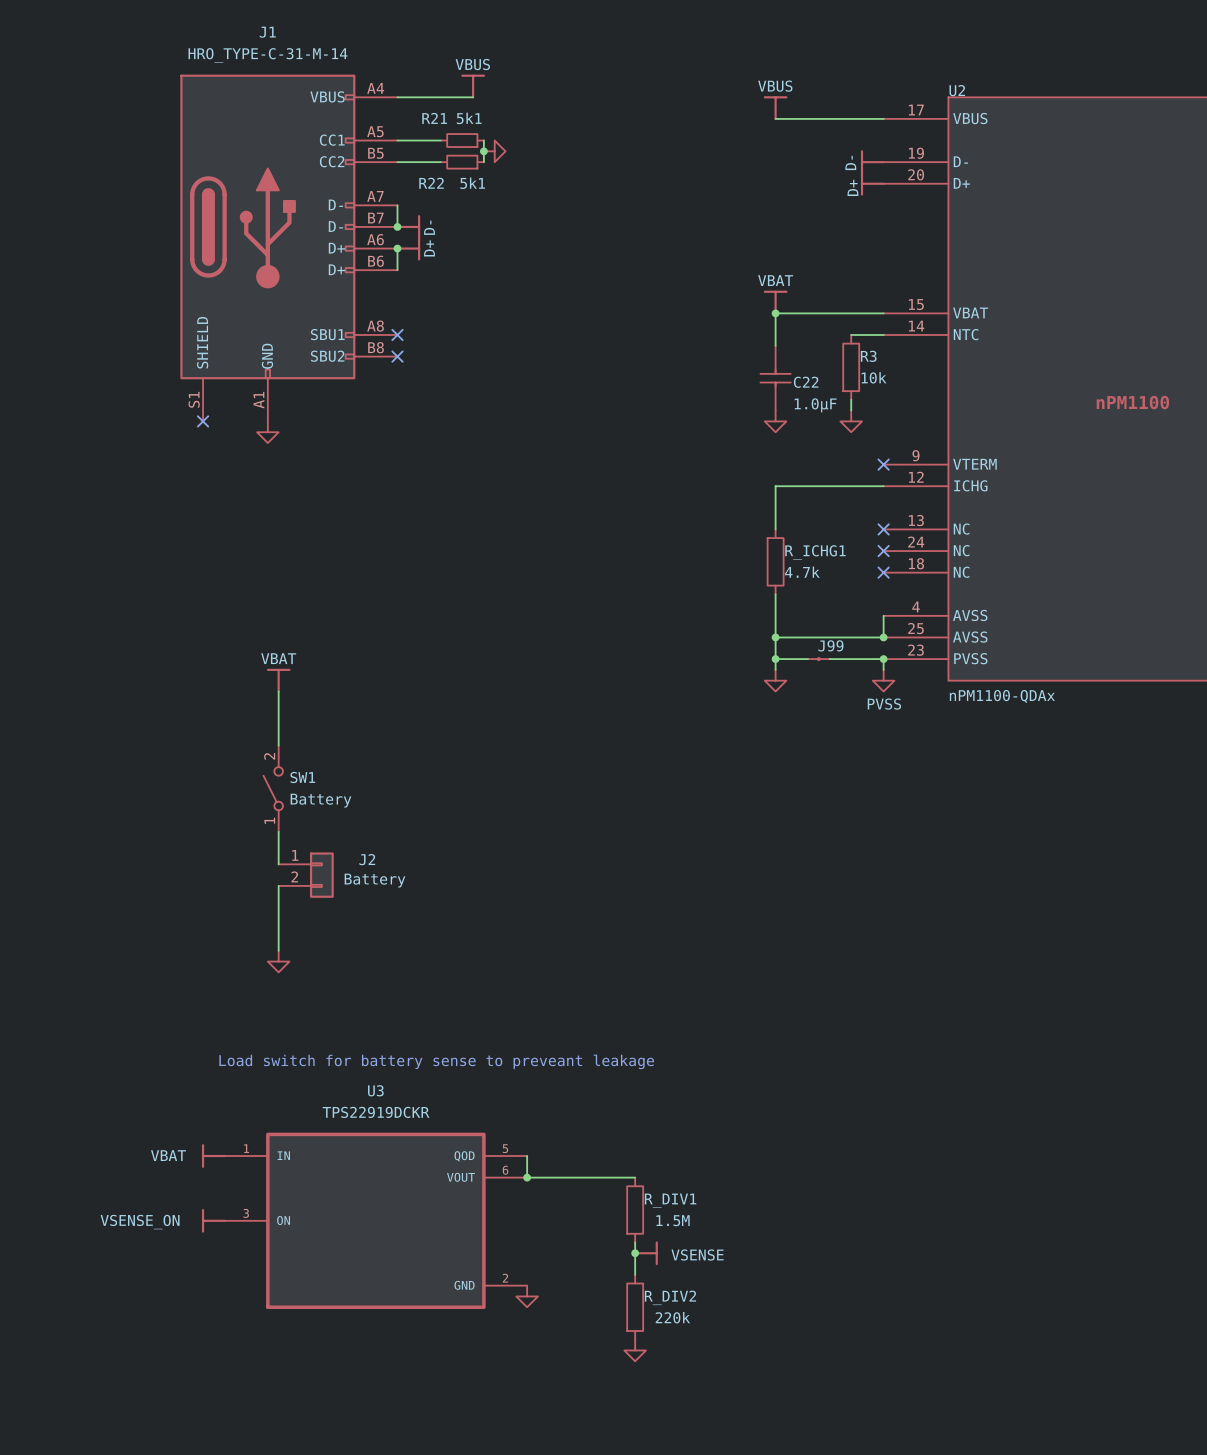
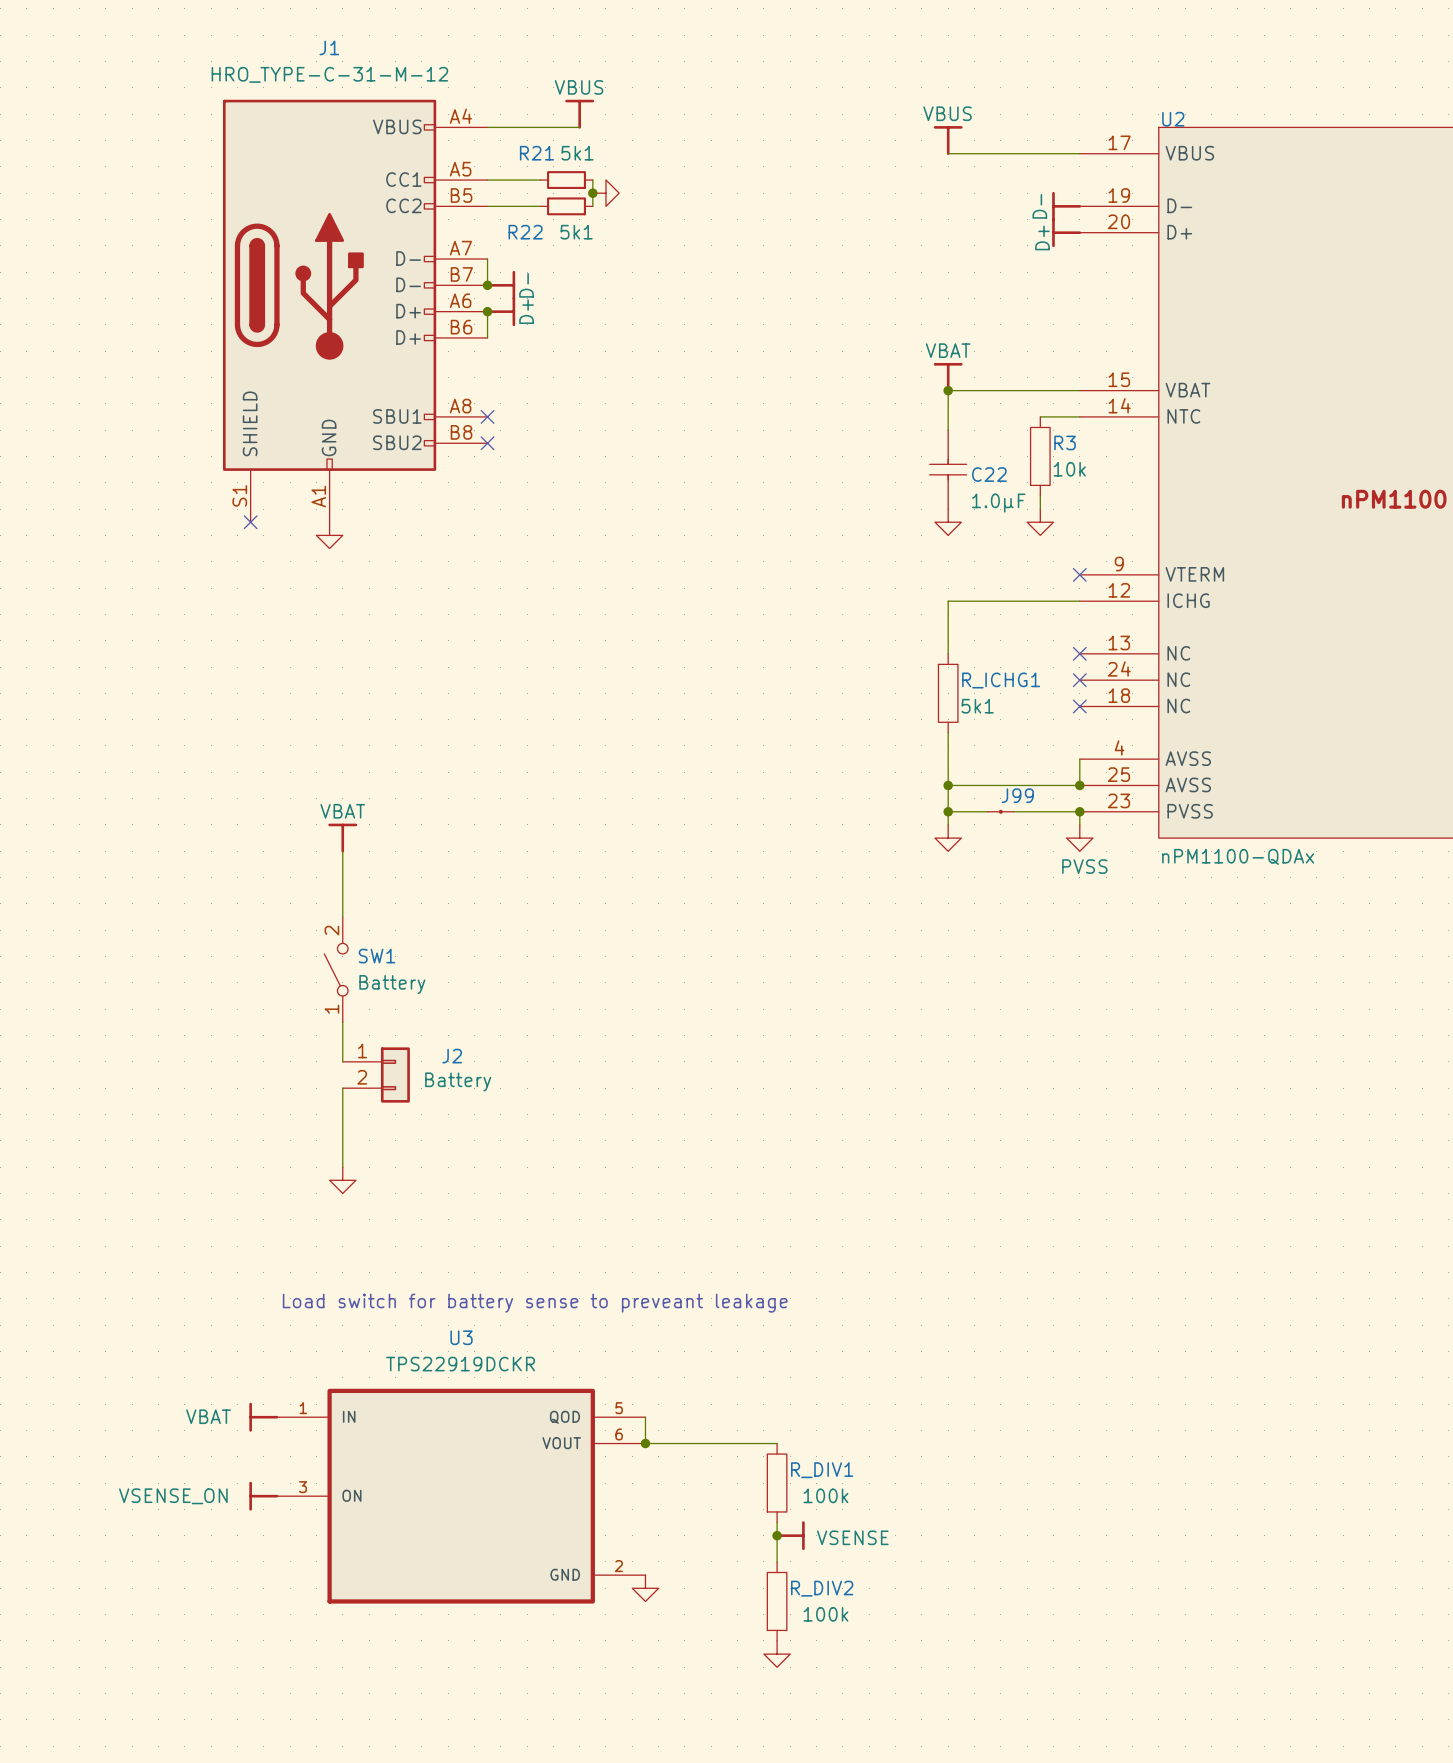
J1 value: HRO_TYPE-C-31-M-14 (267, 55) -> HRO_TYPE-C-31-M-12 (329, 74)
R_ICHG1 value: 4.7k (802, 572) -> 5k1 (977, 706)
R_DIV1 value: 1.5M (673, 1220) -> 100k (825, 1495)
R_DIV2 value: 220k (672, 1317) -> 100k (825, 1614)

